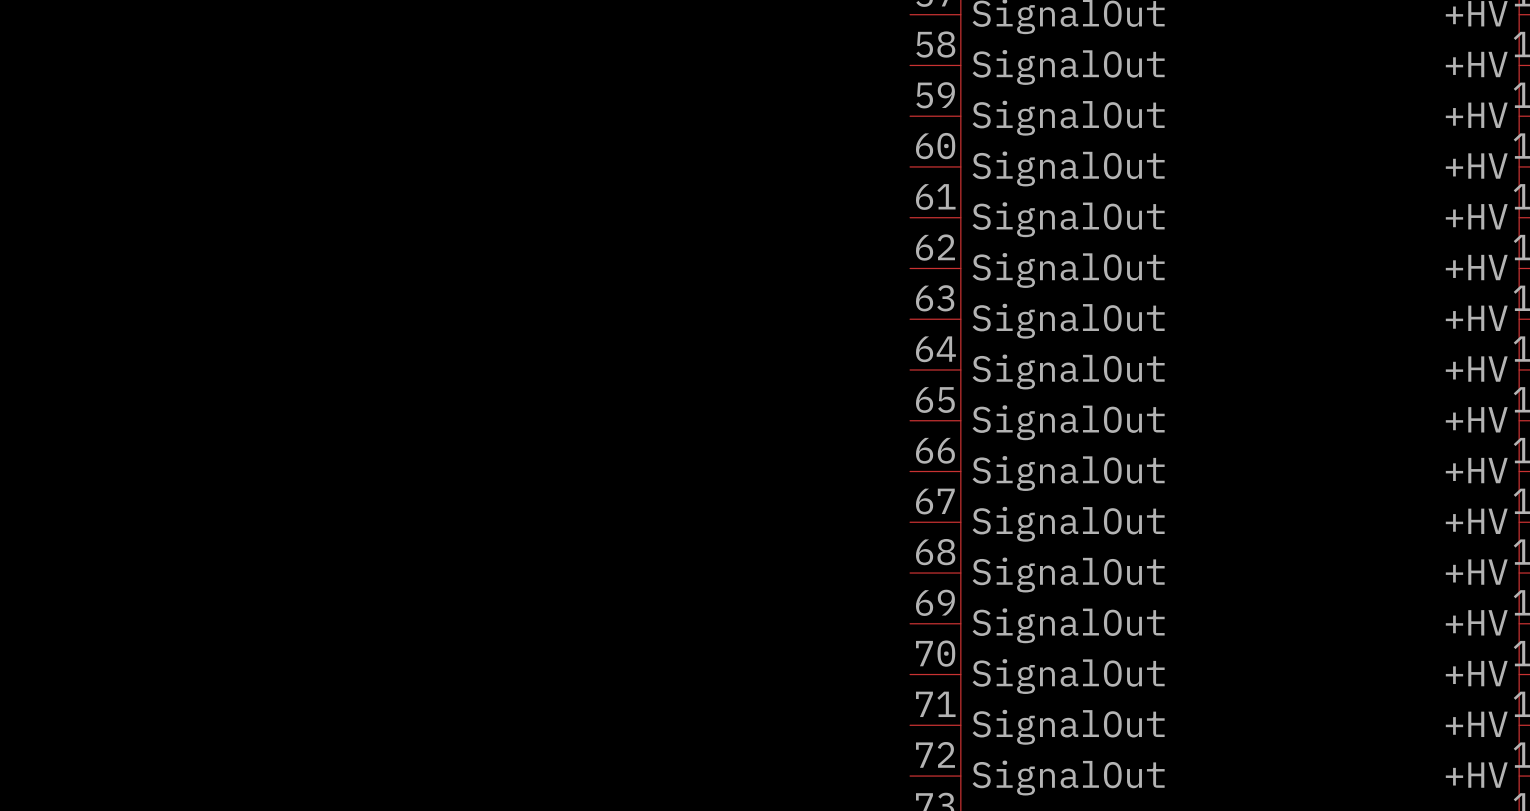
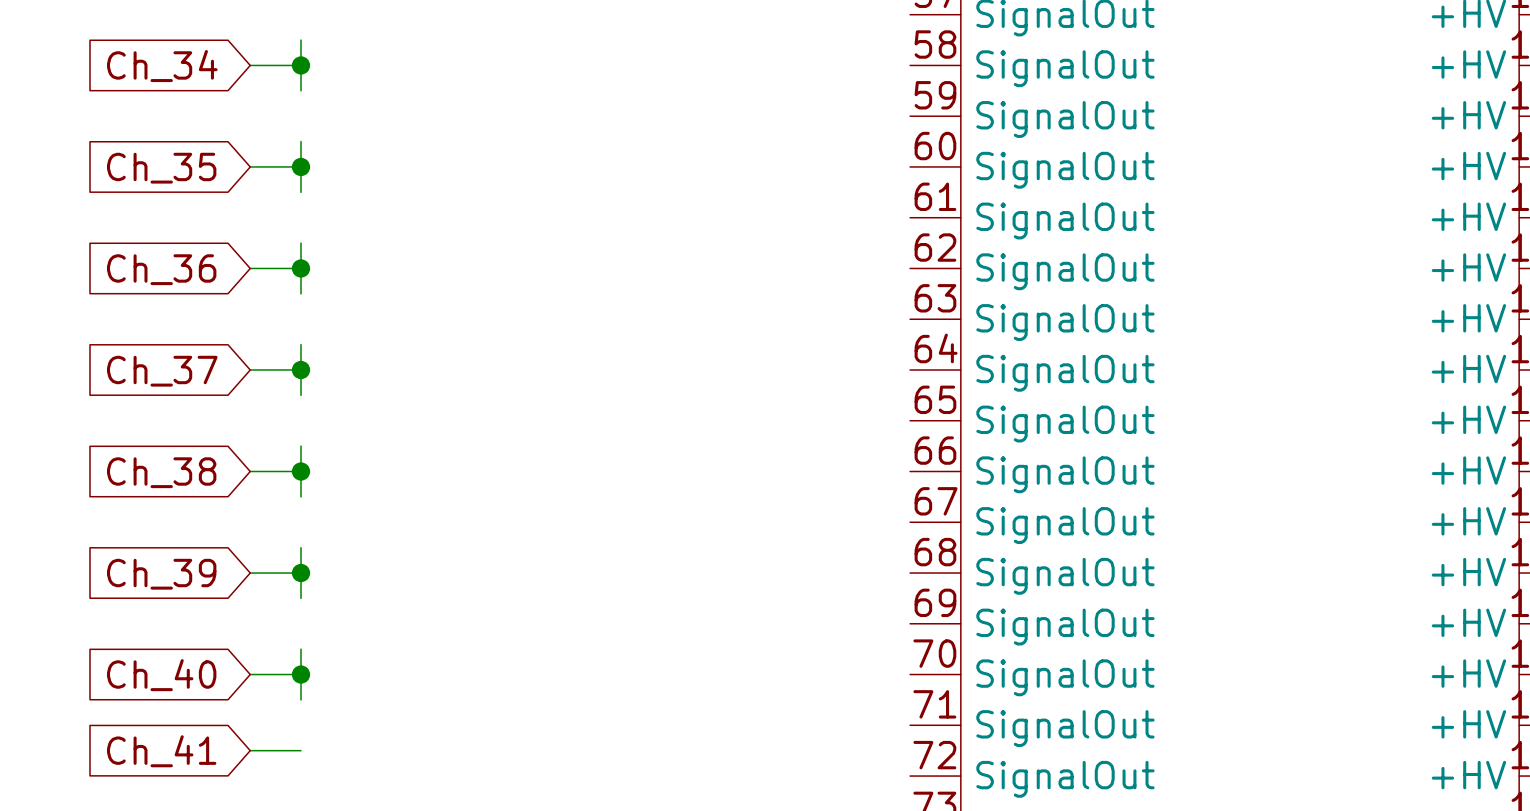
wire: none -> (301, 40) (301, 90)
wire: none -> (250, 65) (301, 65)
junction: none -> (301, 65)
global label: none -> Ch_34 (162, 66)
wire: none -> (301, 141) (301, 192)
wire: none -> (250, 166) (301, 166)
junction: none -> (301, 166)
global label: none -> Ch_35 (161, 168)
wire: none -> (301, 243) (301, 293)
wire: none -> (250, 268) (301, 268)
junction: none -> (301, 268)
global label: none -> Ch_36 (161, 269)
wire: none -> (301, 344) (301, 395)
wire: none -> (250, 369) (301, 369)
junction: none -> (301, 369)
global label: none -> Ch_37 (162, 371)
wire: none -> (301, 446) (301, 496)
wire: none -> (250, 471) (301, 471)
junction: none -> (301, 471)
global label: none -> Ch_38 (161, 472)
wire: none -> (301, 547) (301, 598)
wire: none -> (250, 573) (301, 573)
junction: none -> (301, 573)
global label: none -> Ch_39 (161, 574)
wire: none -> (301, 649) (301, 699)
wire: none -> (250, 674) (301, 674)
junction: none -> (301, 674)
global label: none -> Ch_40 (161, 675)
wire: none -> (250, 750) (301, 750)
global label: none -> Ch_41 (161, 751)

